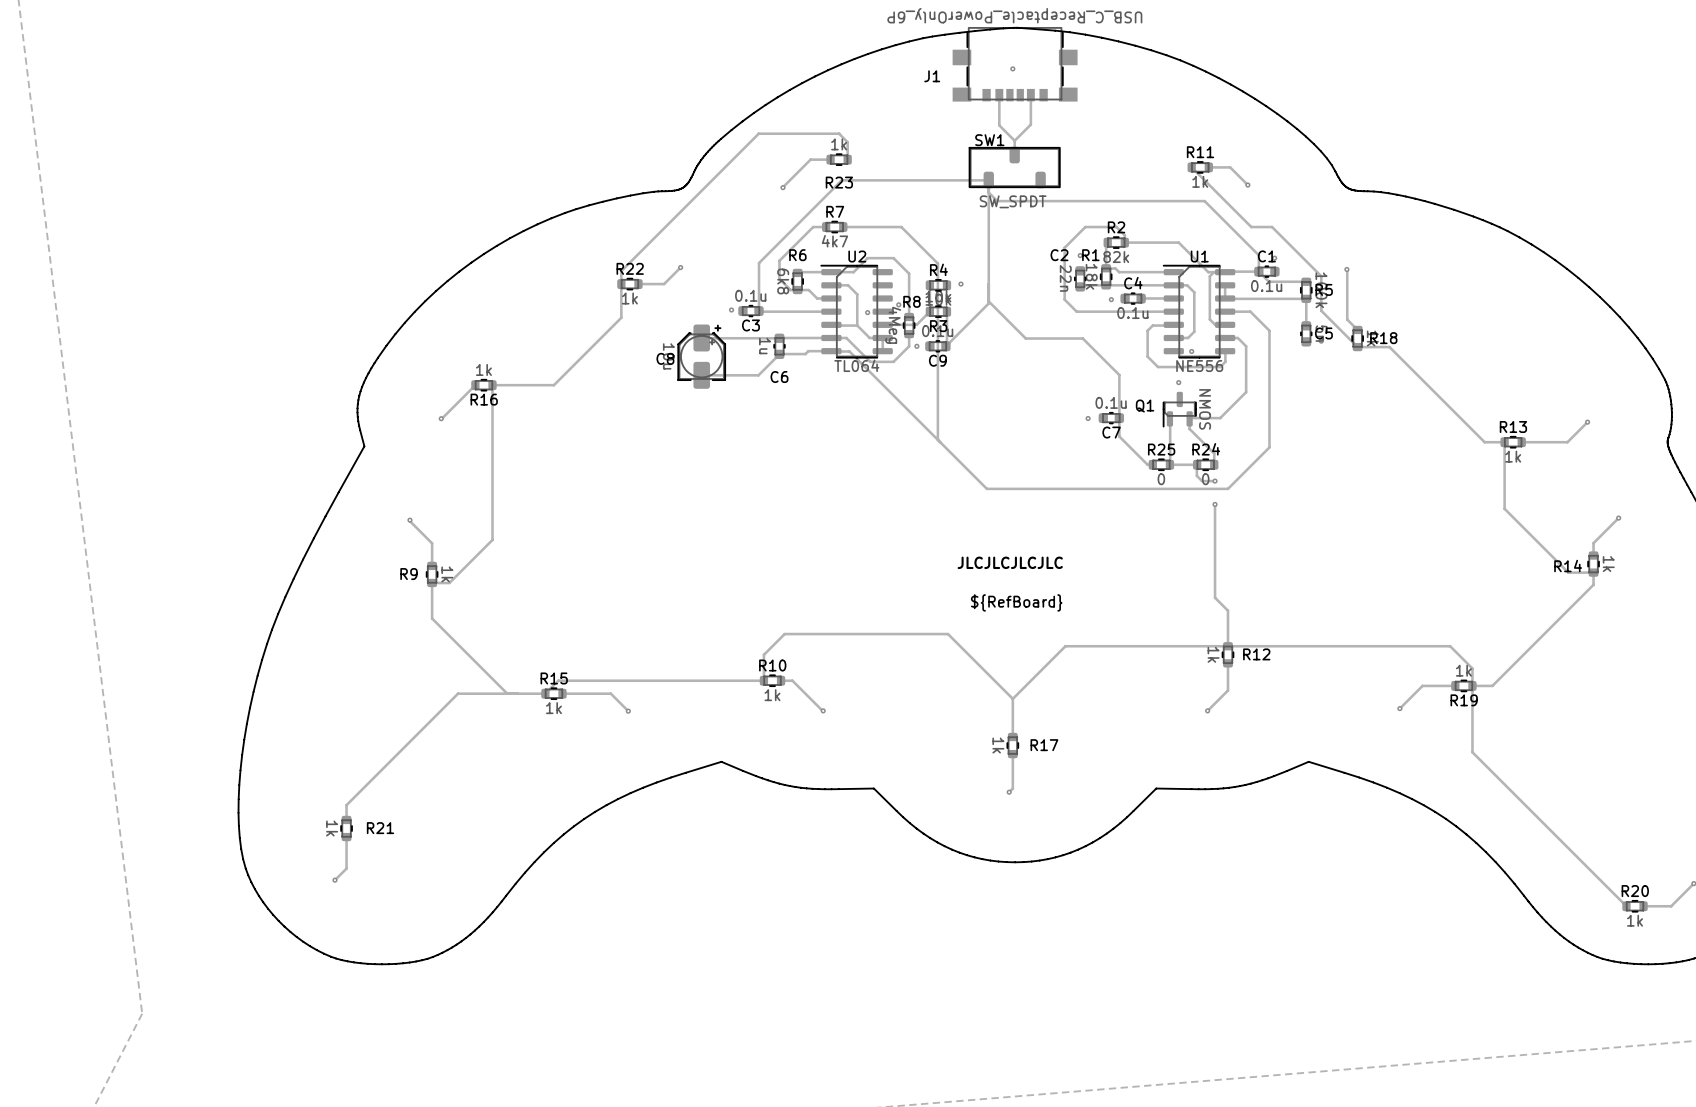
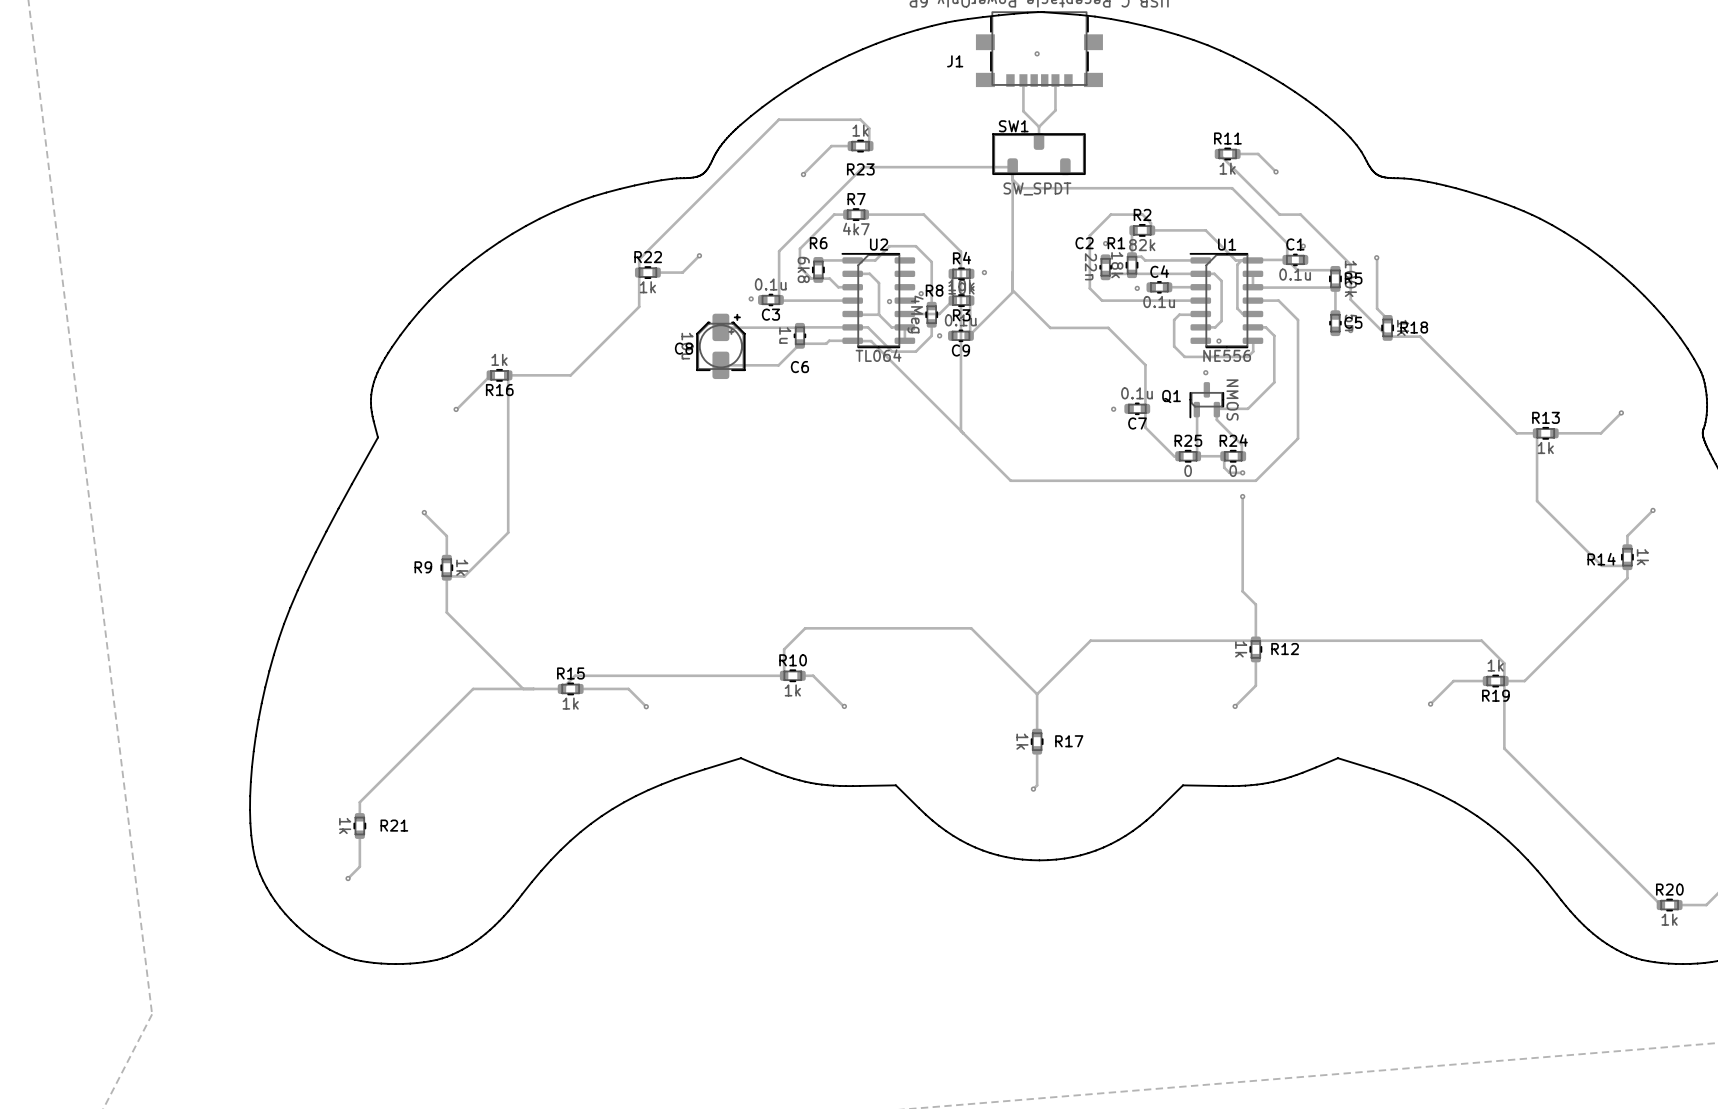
text: JLCJLCJLCJLC (1010, 562) -> none
text: ${RefBoard} (1016, 602) -> none

